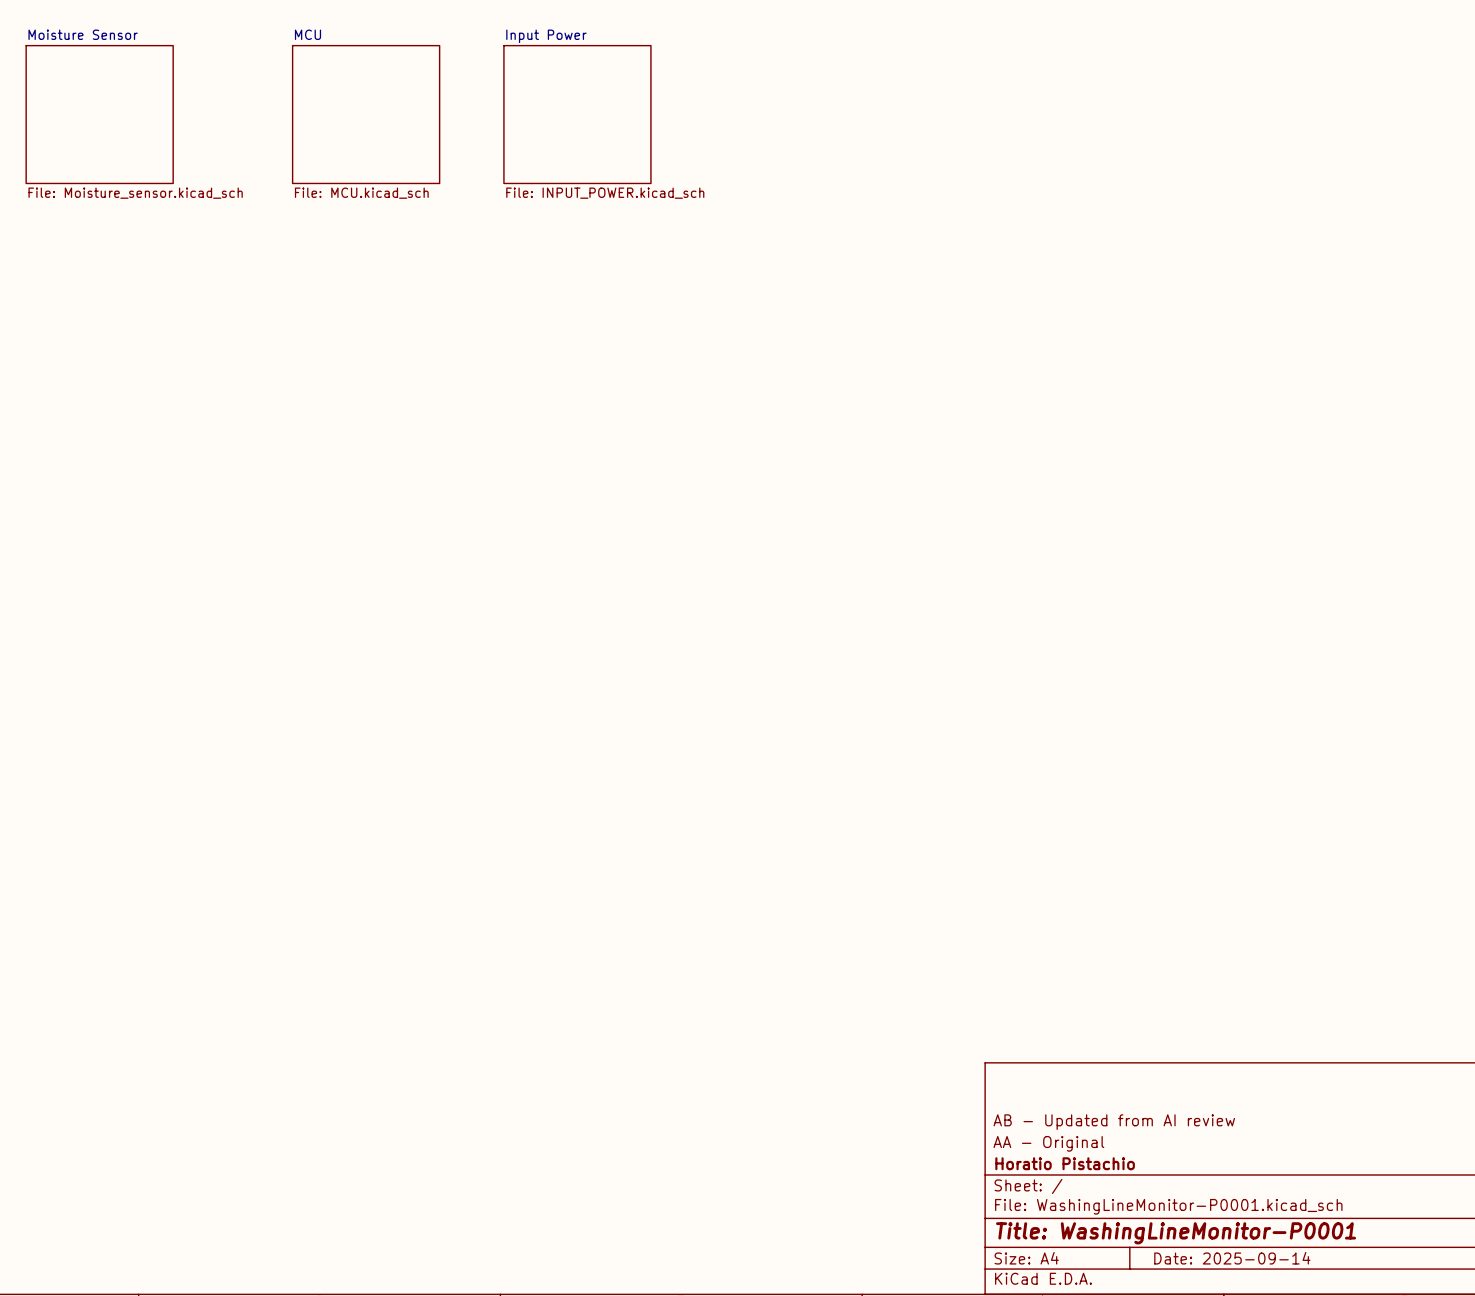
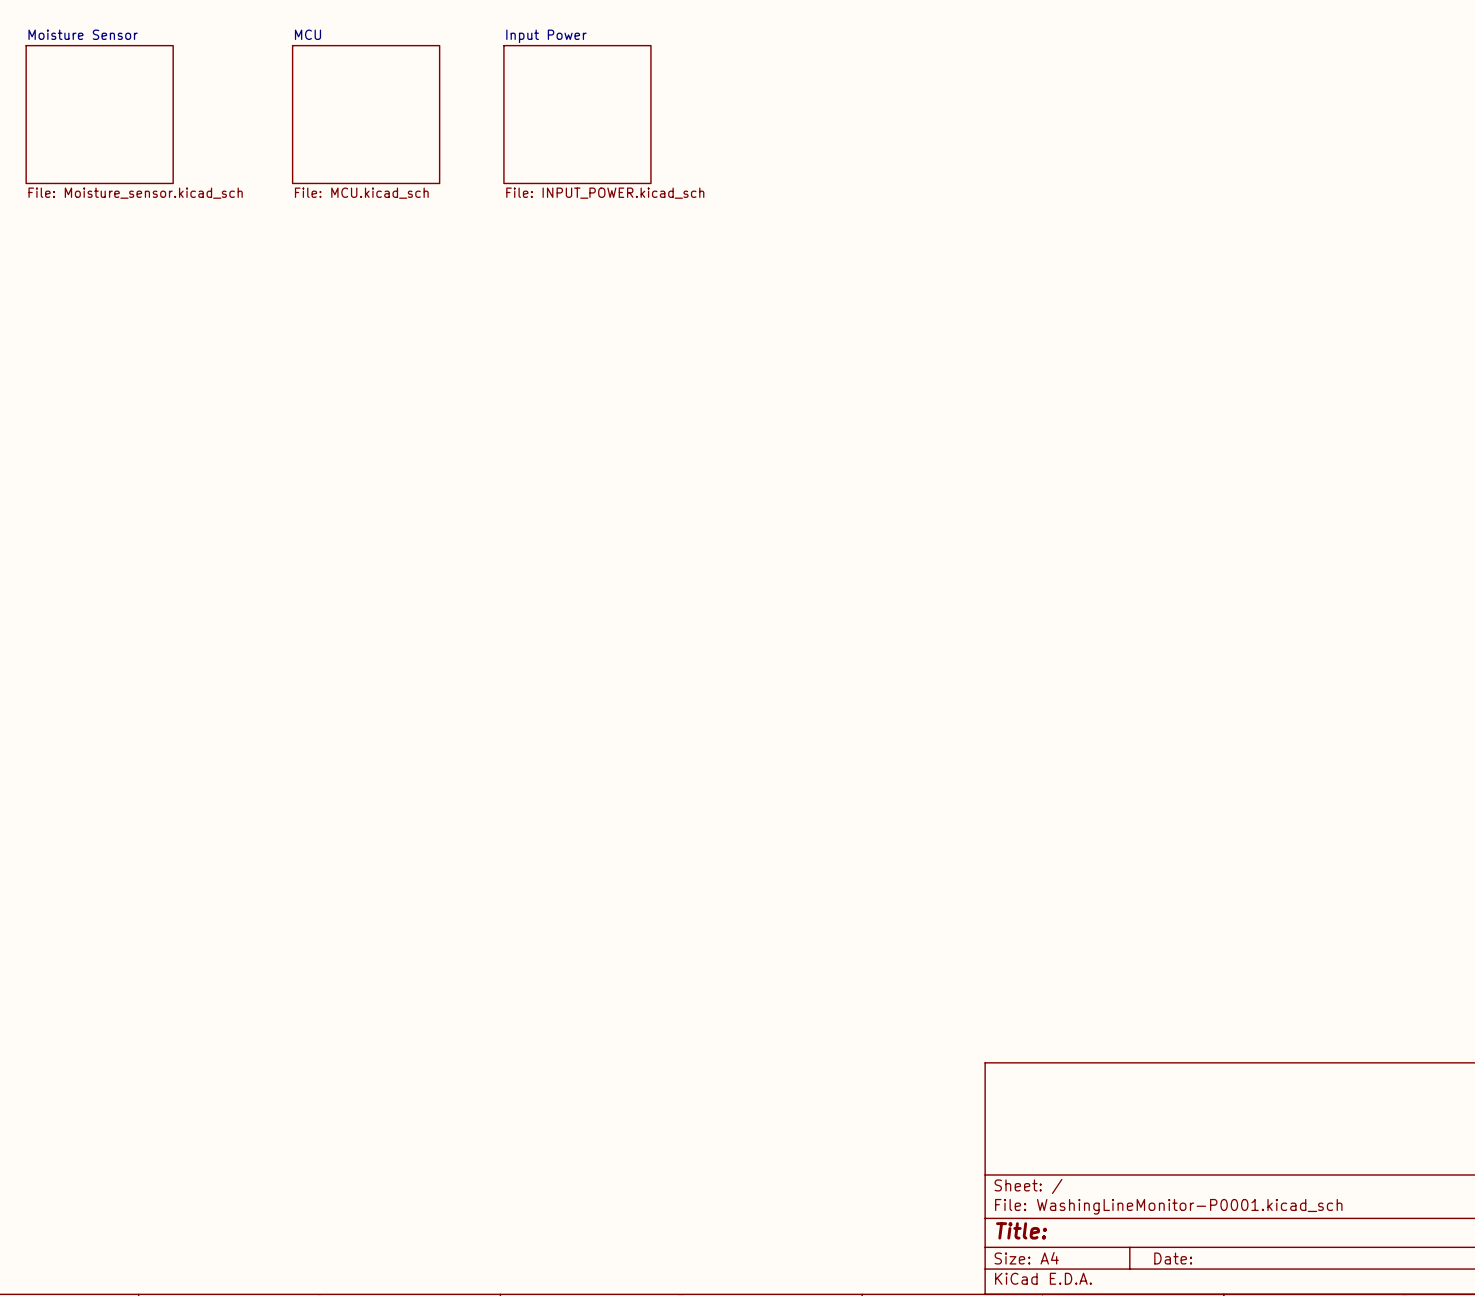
title block: AB - Updated from AI review (1114, 1122) -> none
title block: AA - Original (1048, 1143) -> none
title block: Horatio Pistachio (1065, 1163) -> none
title block: Title: WashingLineMonitor-P0001 (1176, 1233) -> Title: (1021, 1230)
title block: Date: 2025-09-14 (1232, 1258) -> Date: (1173, 1258)

